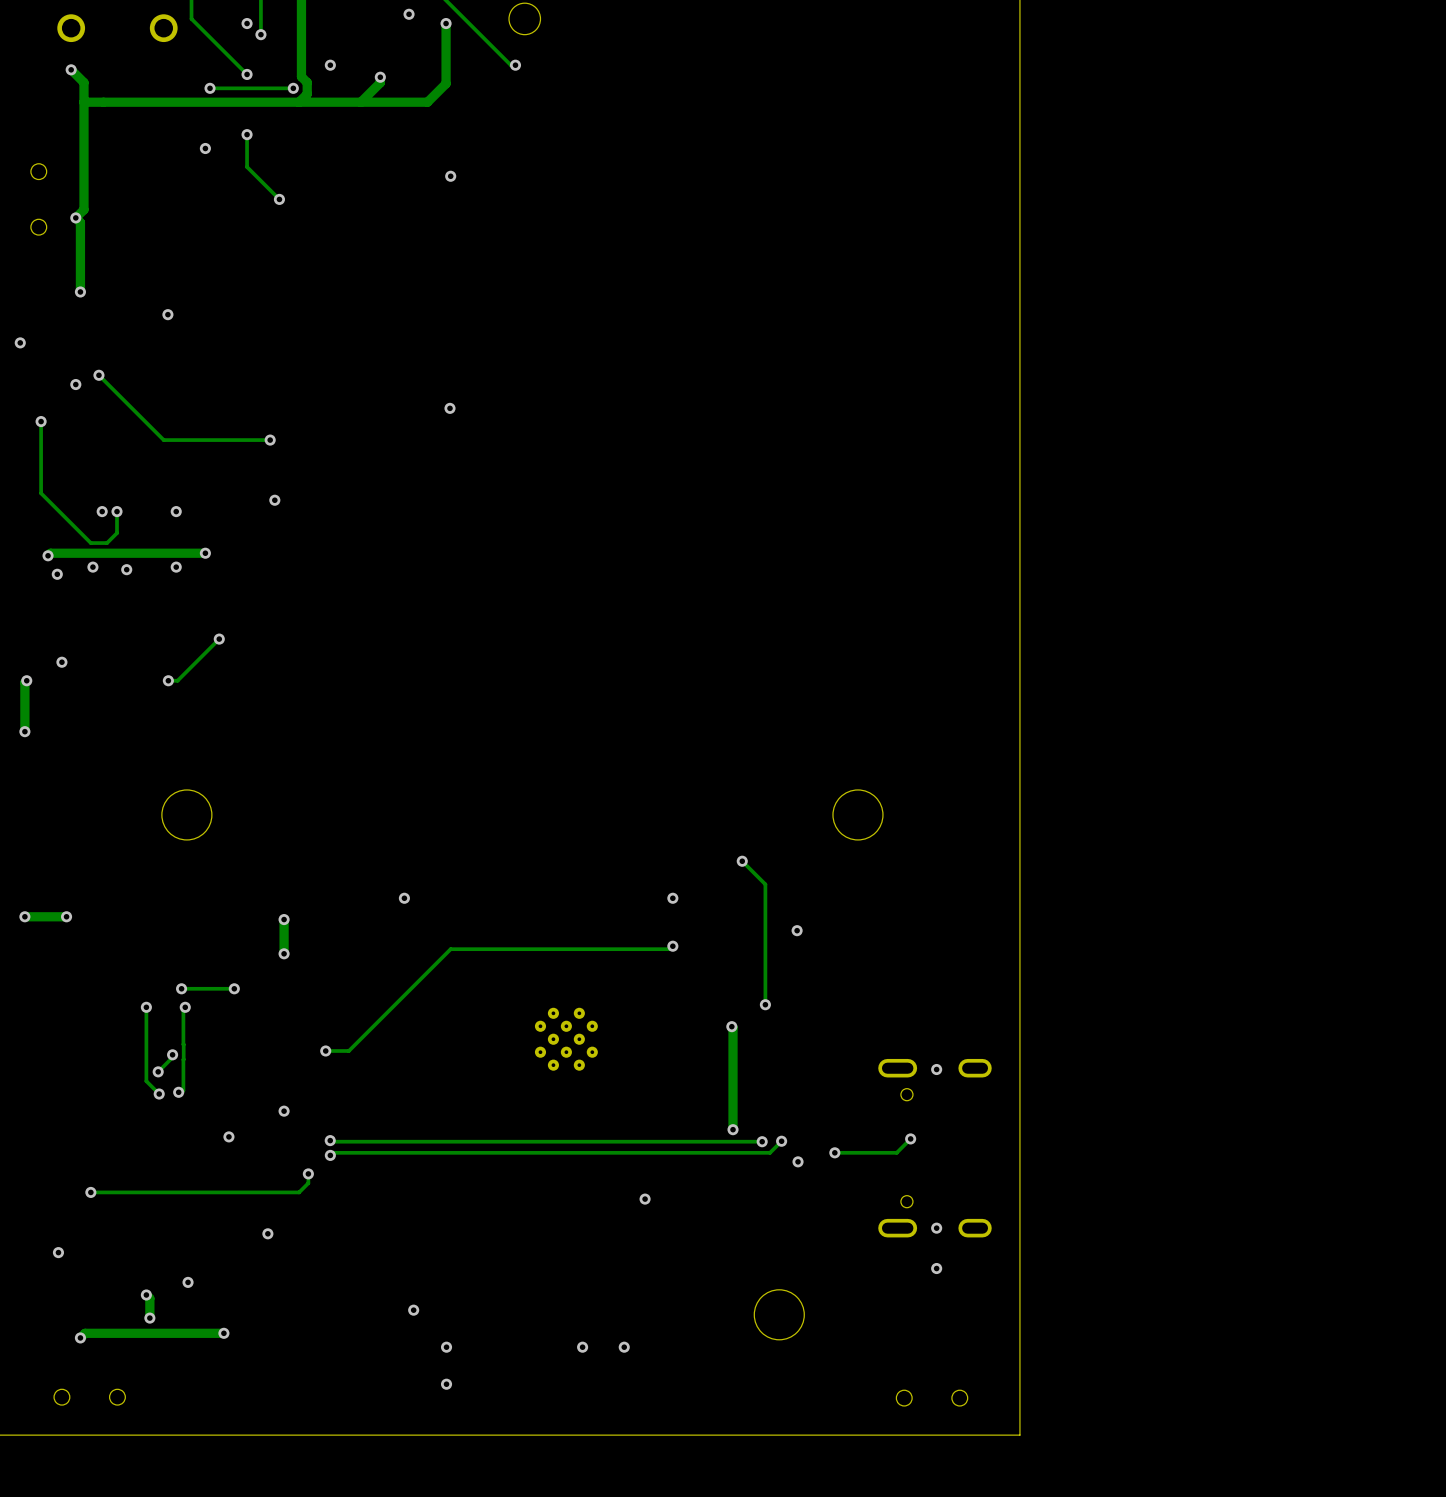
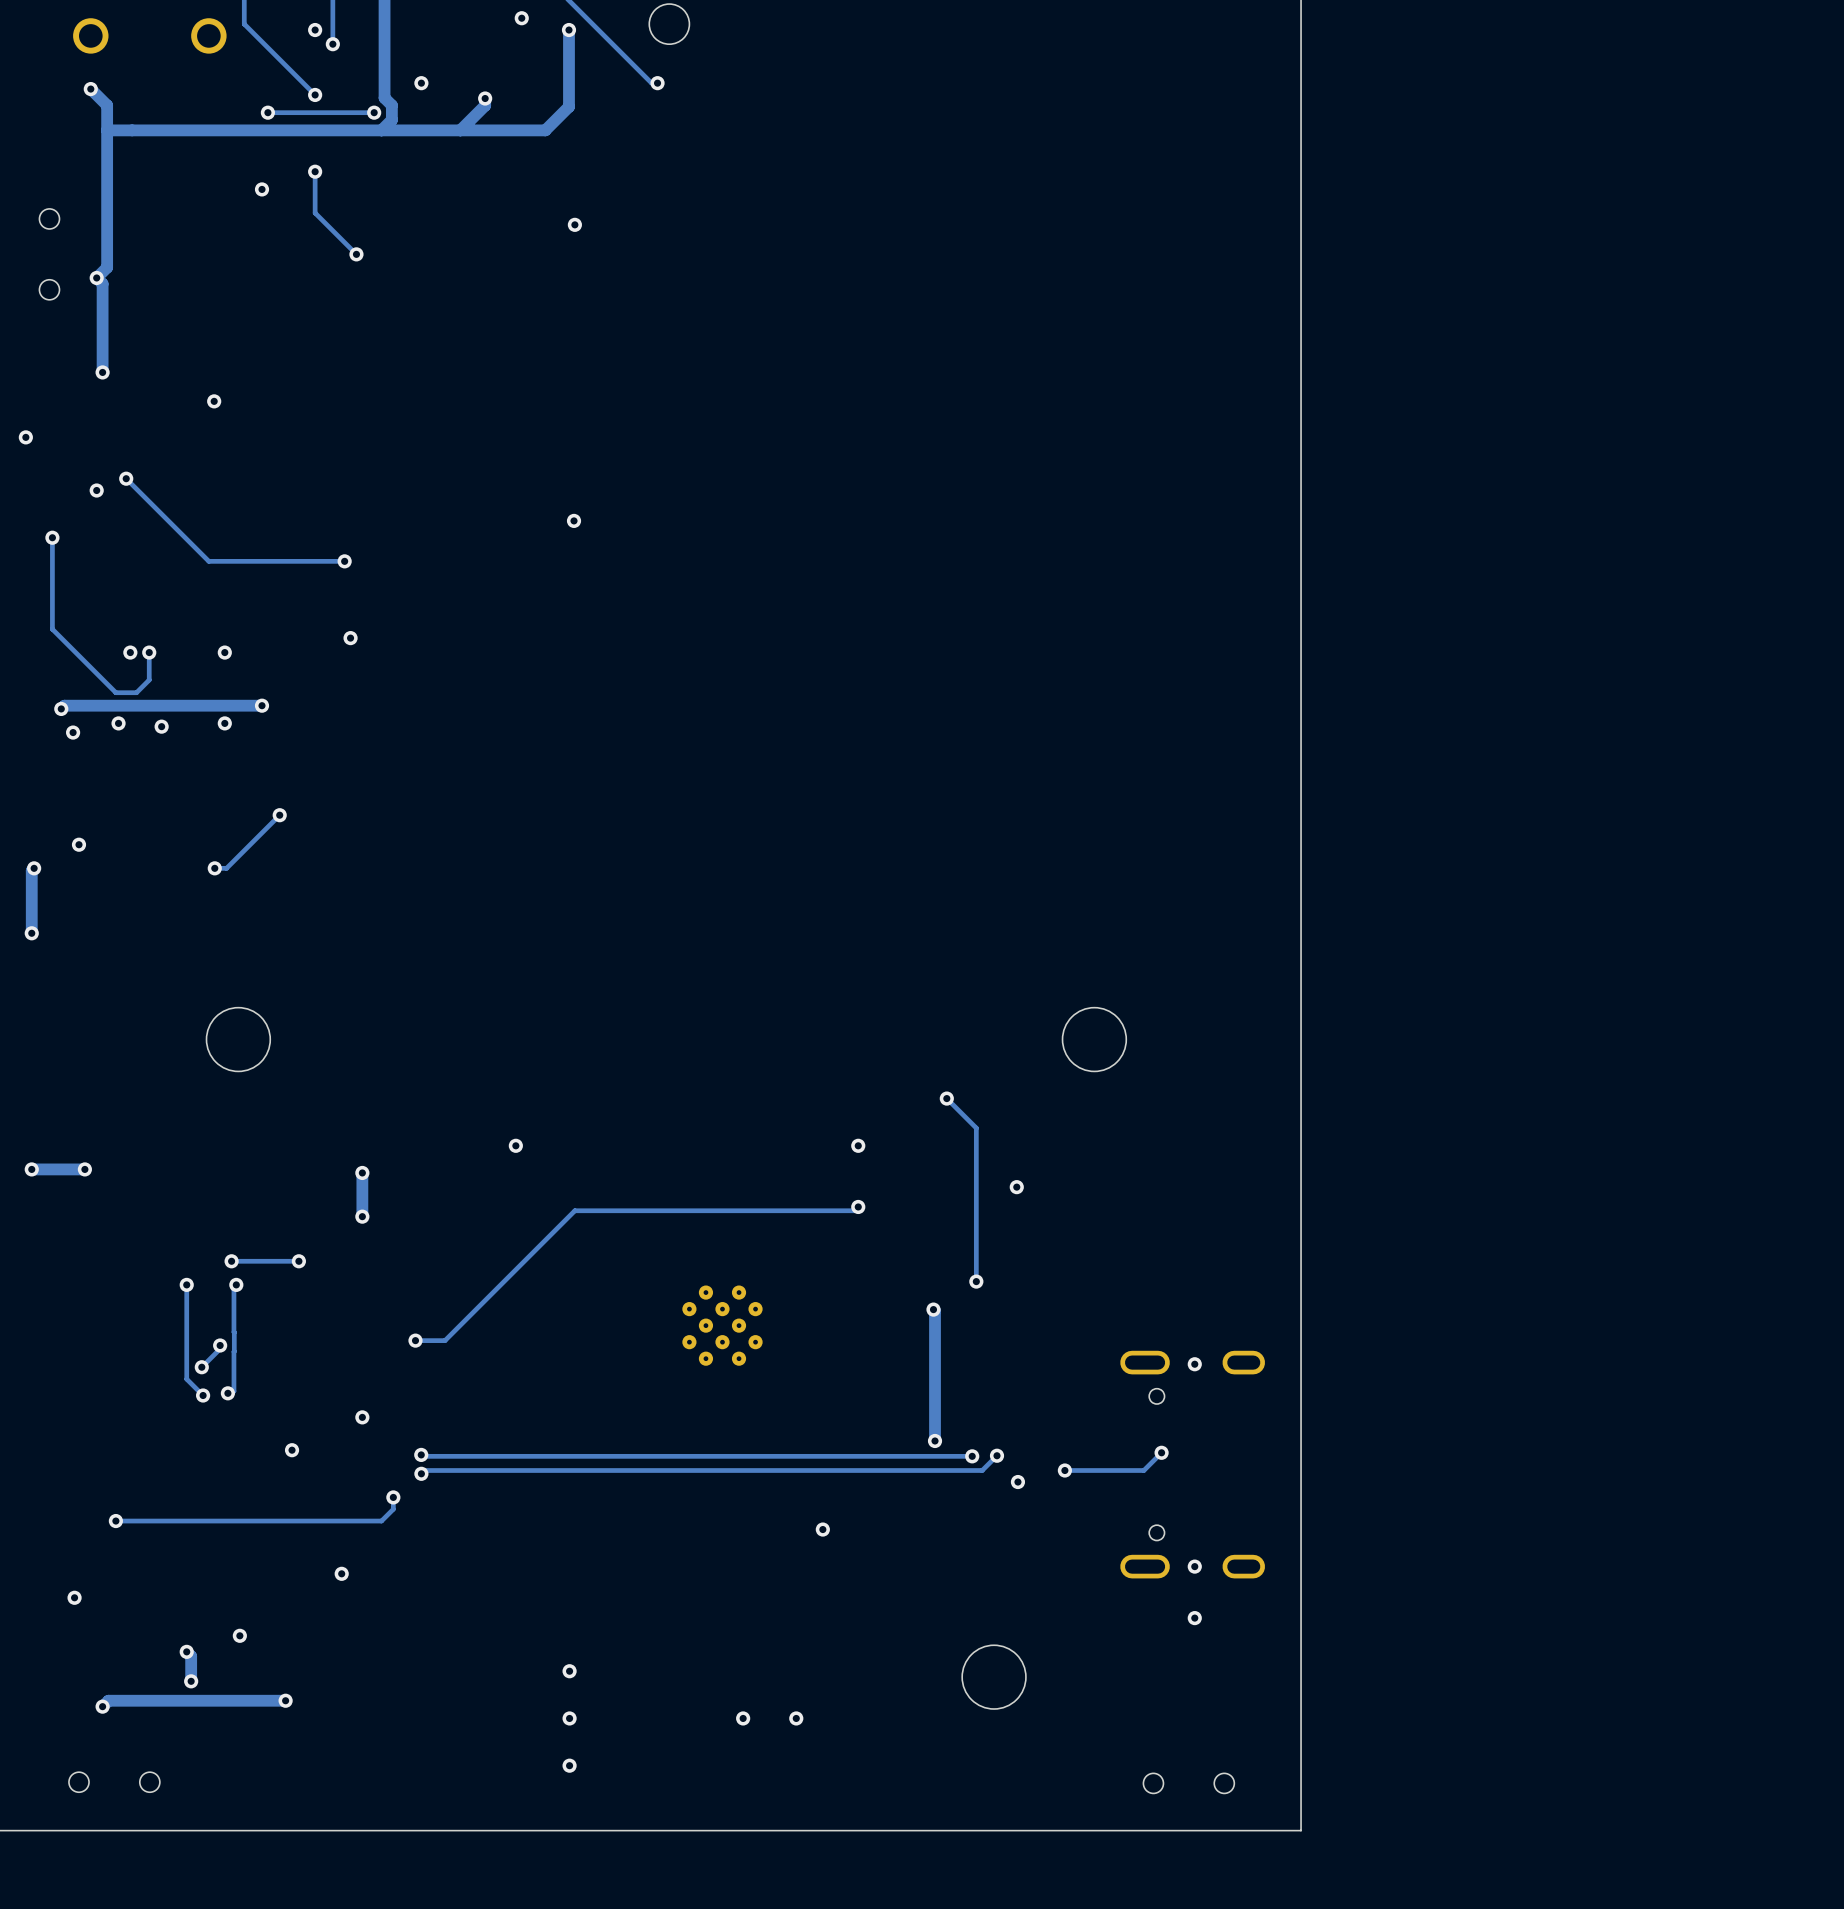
via position: (413, 1310) -> (569, 1671)

